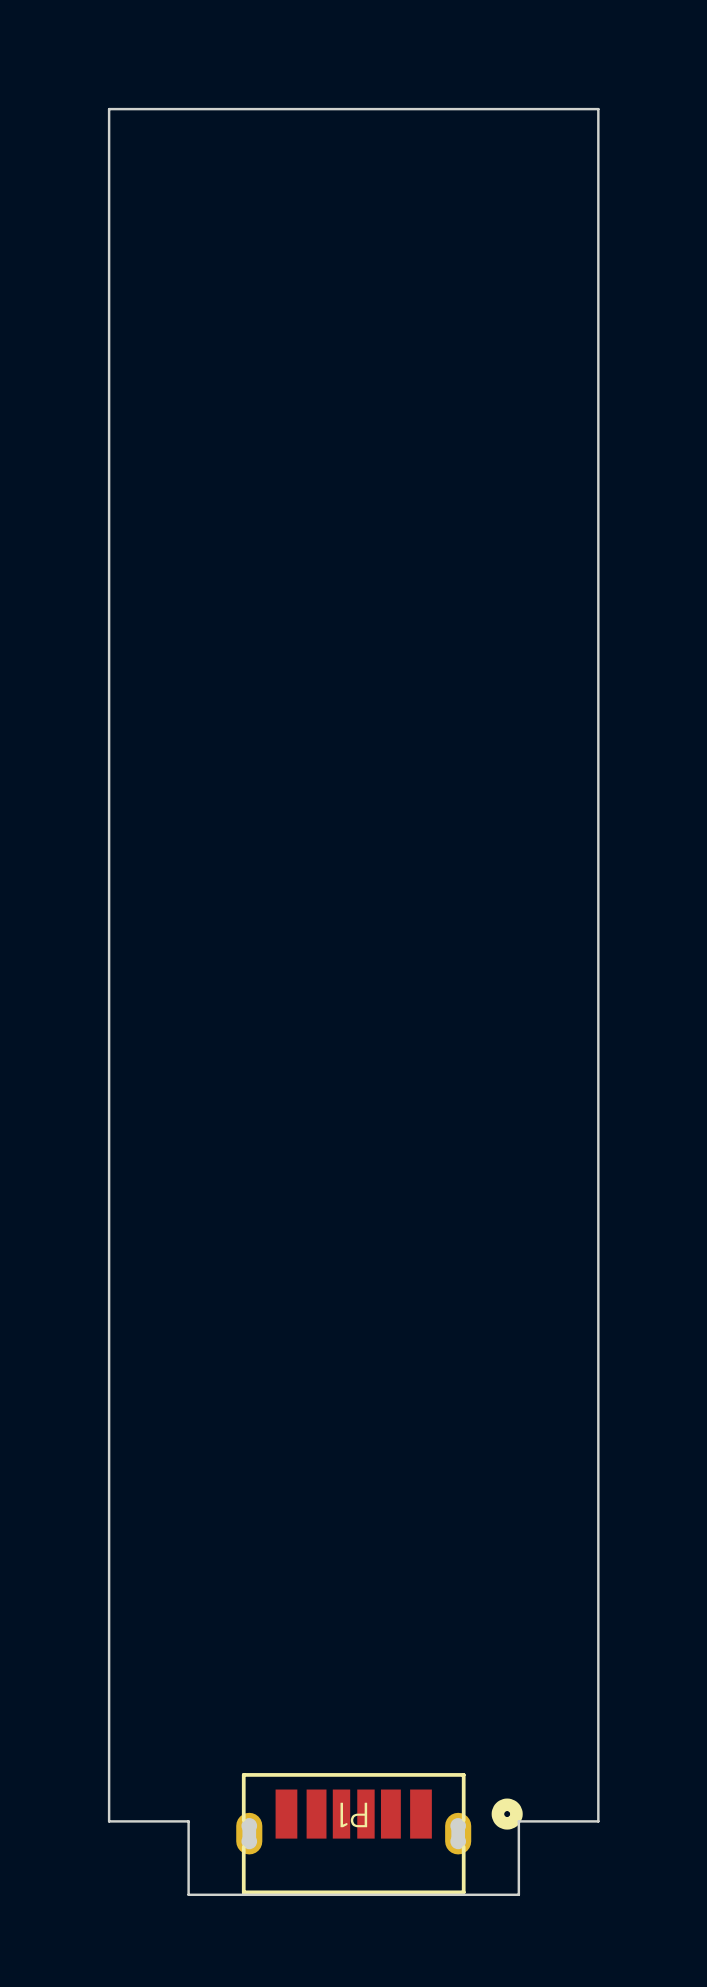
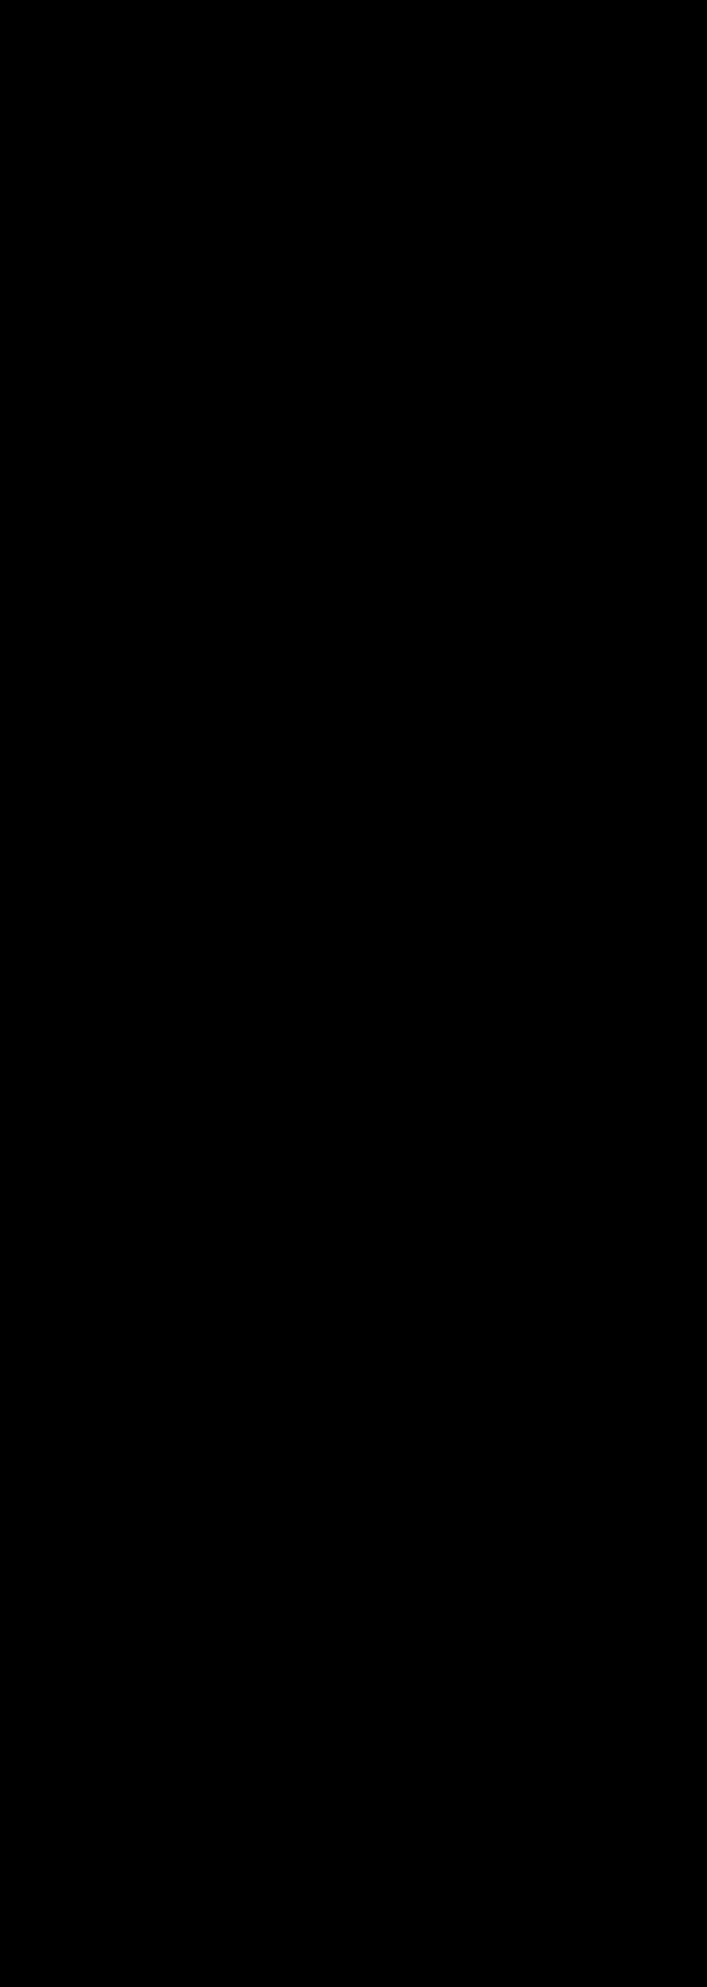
board edge: (109, 109) (109, 1821) (188, 1821) (188, 1894) (518, 1894) (518, 1821) (598, 1821) (598, 109) (109, 109) -> none
P1: (379, 1833) -> none

